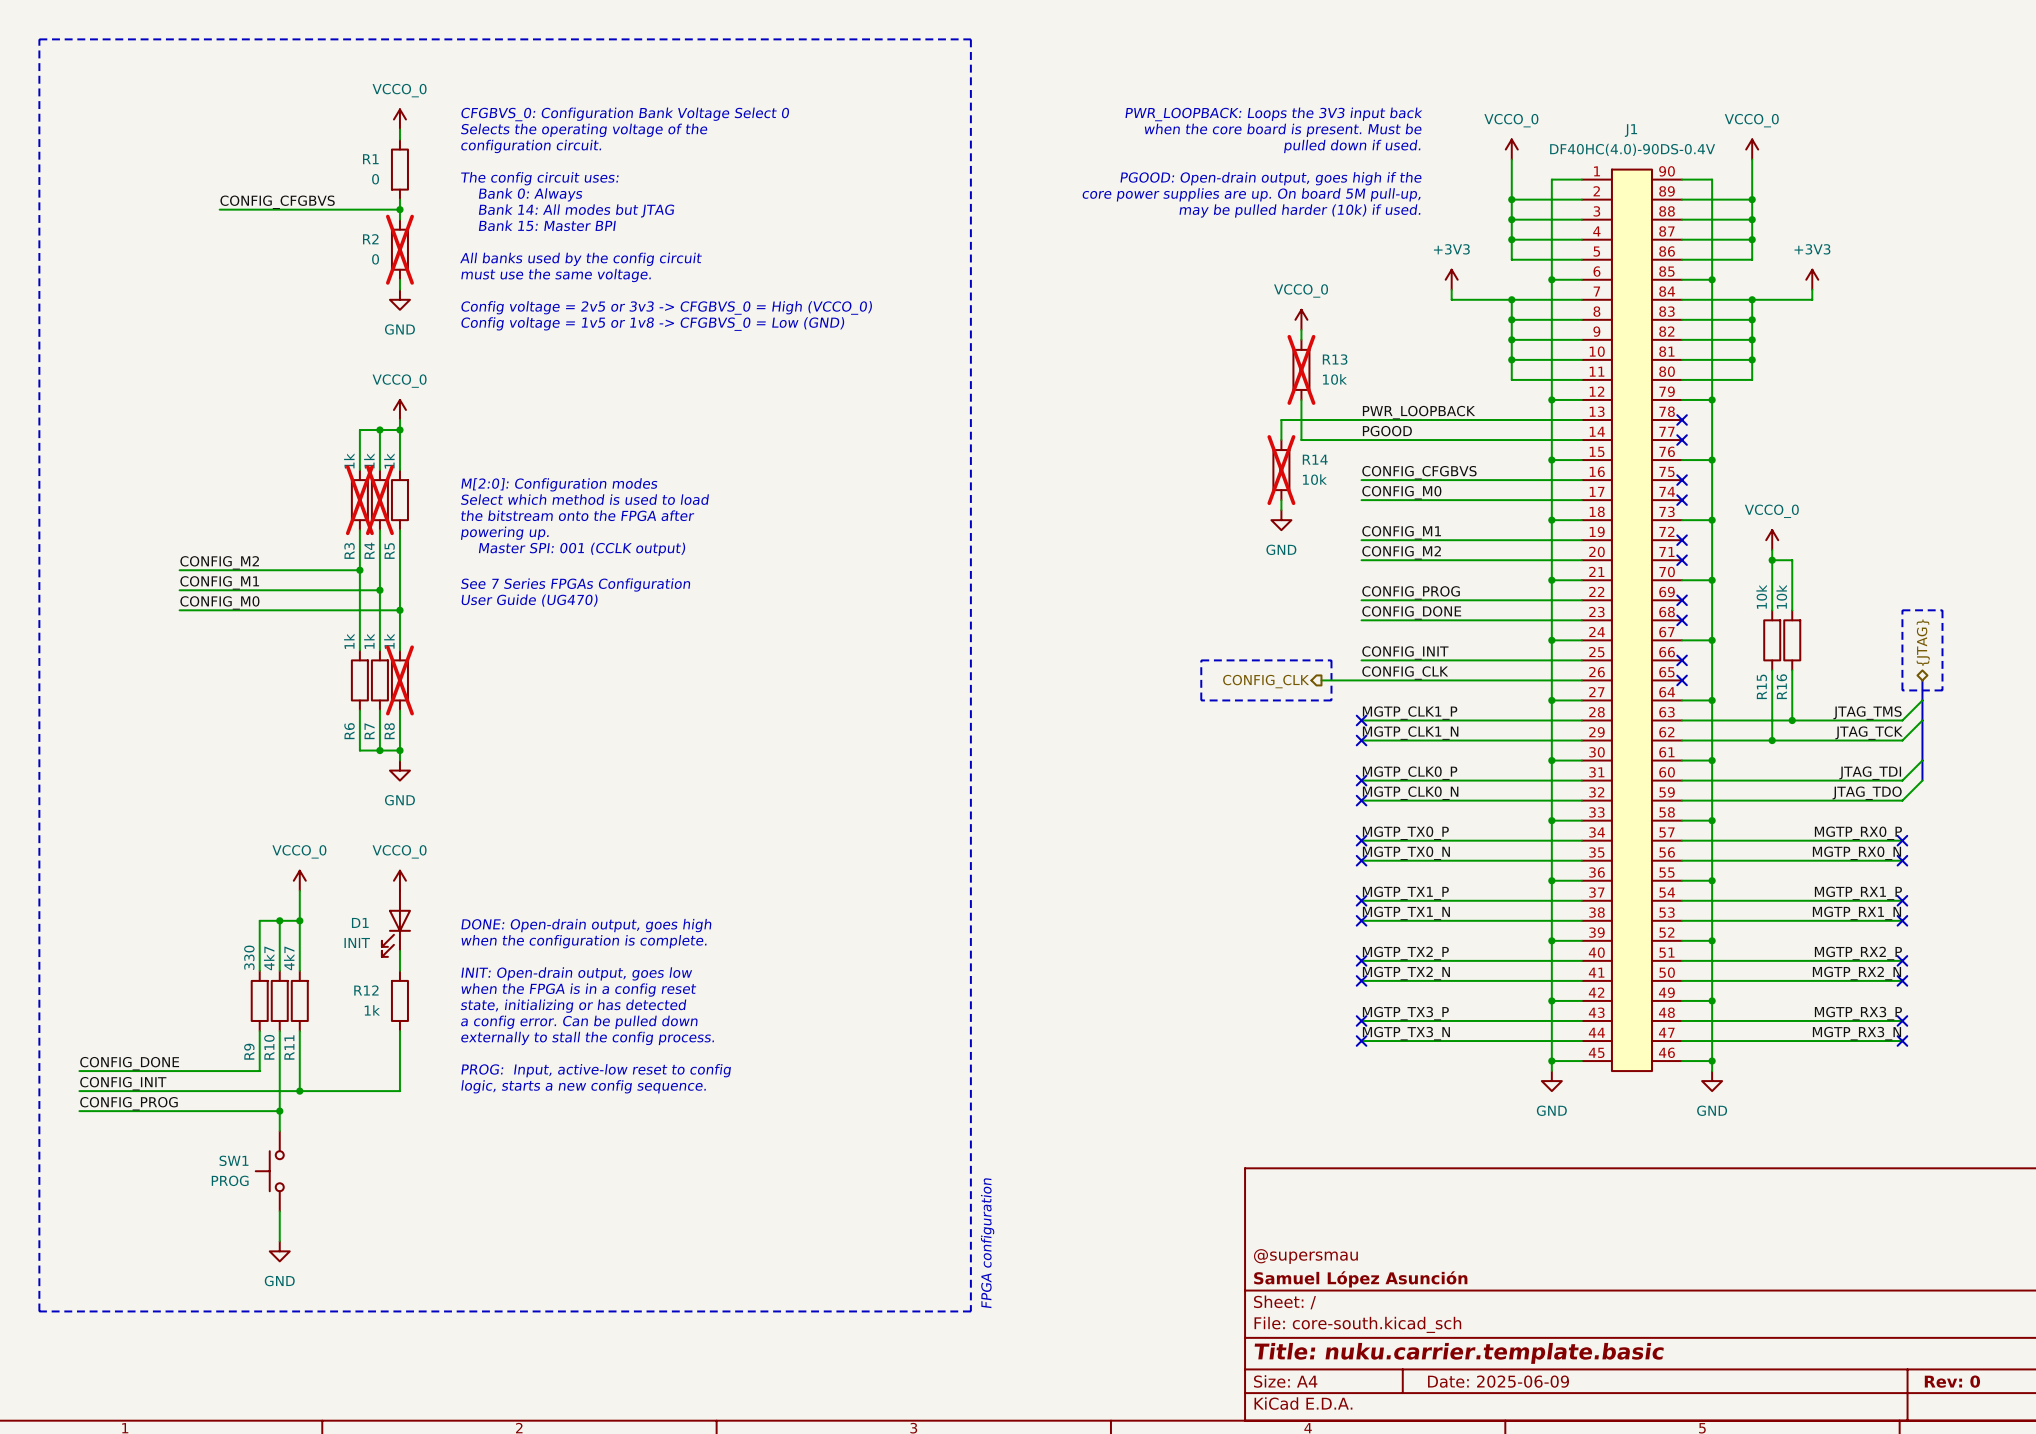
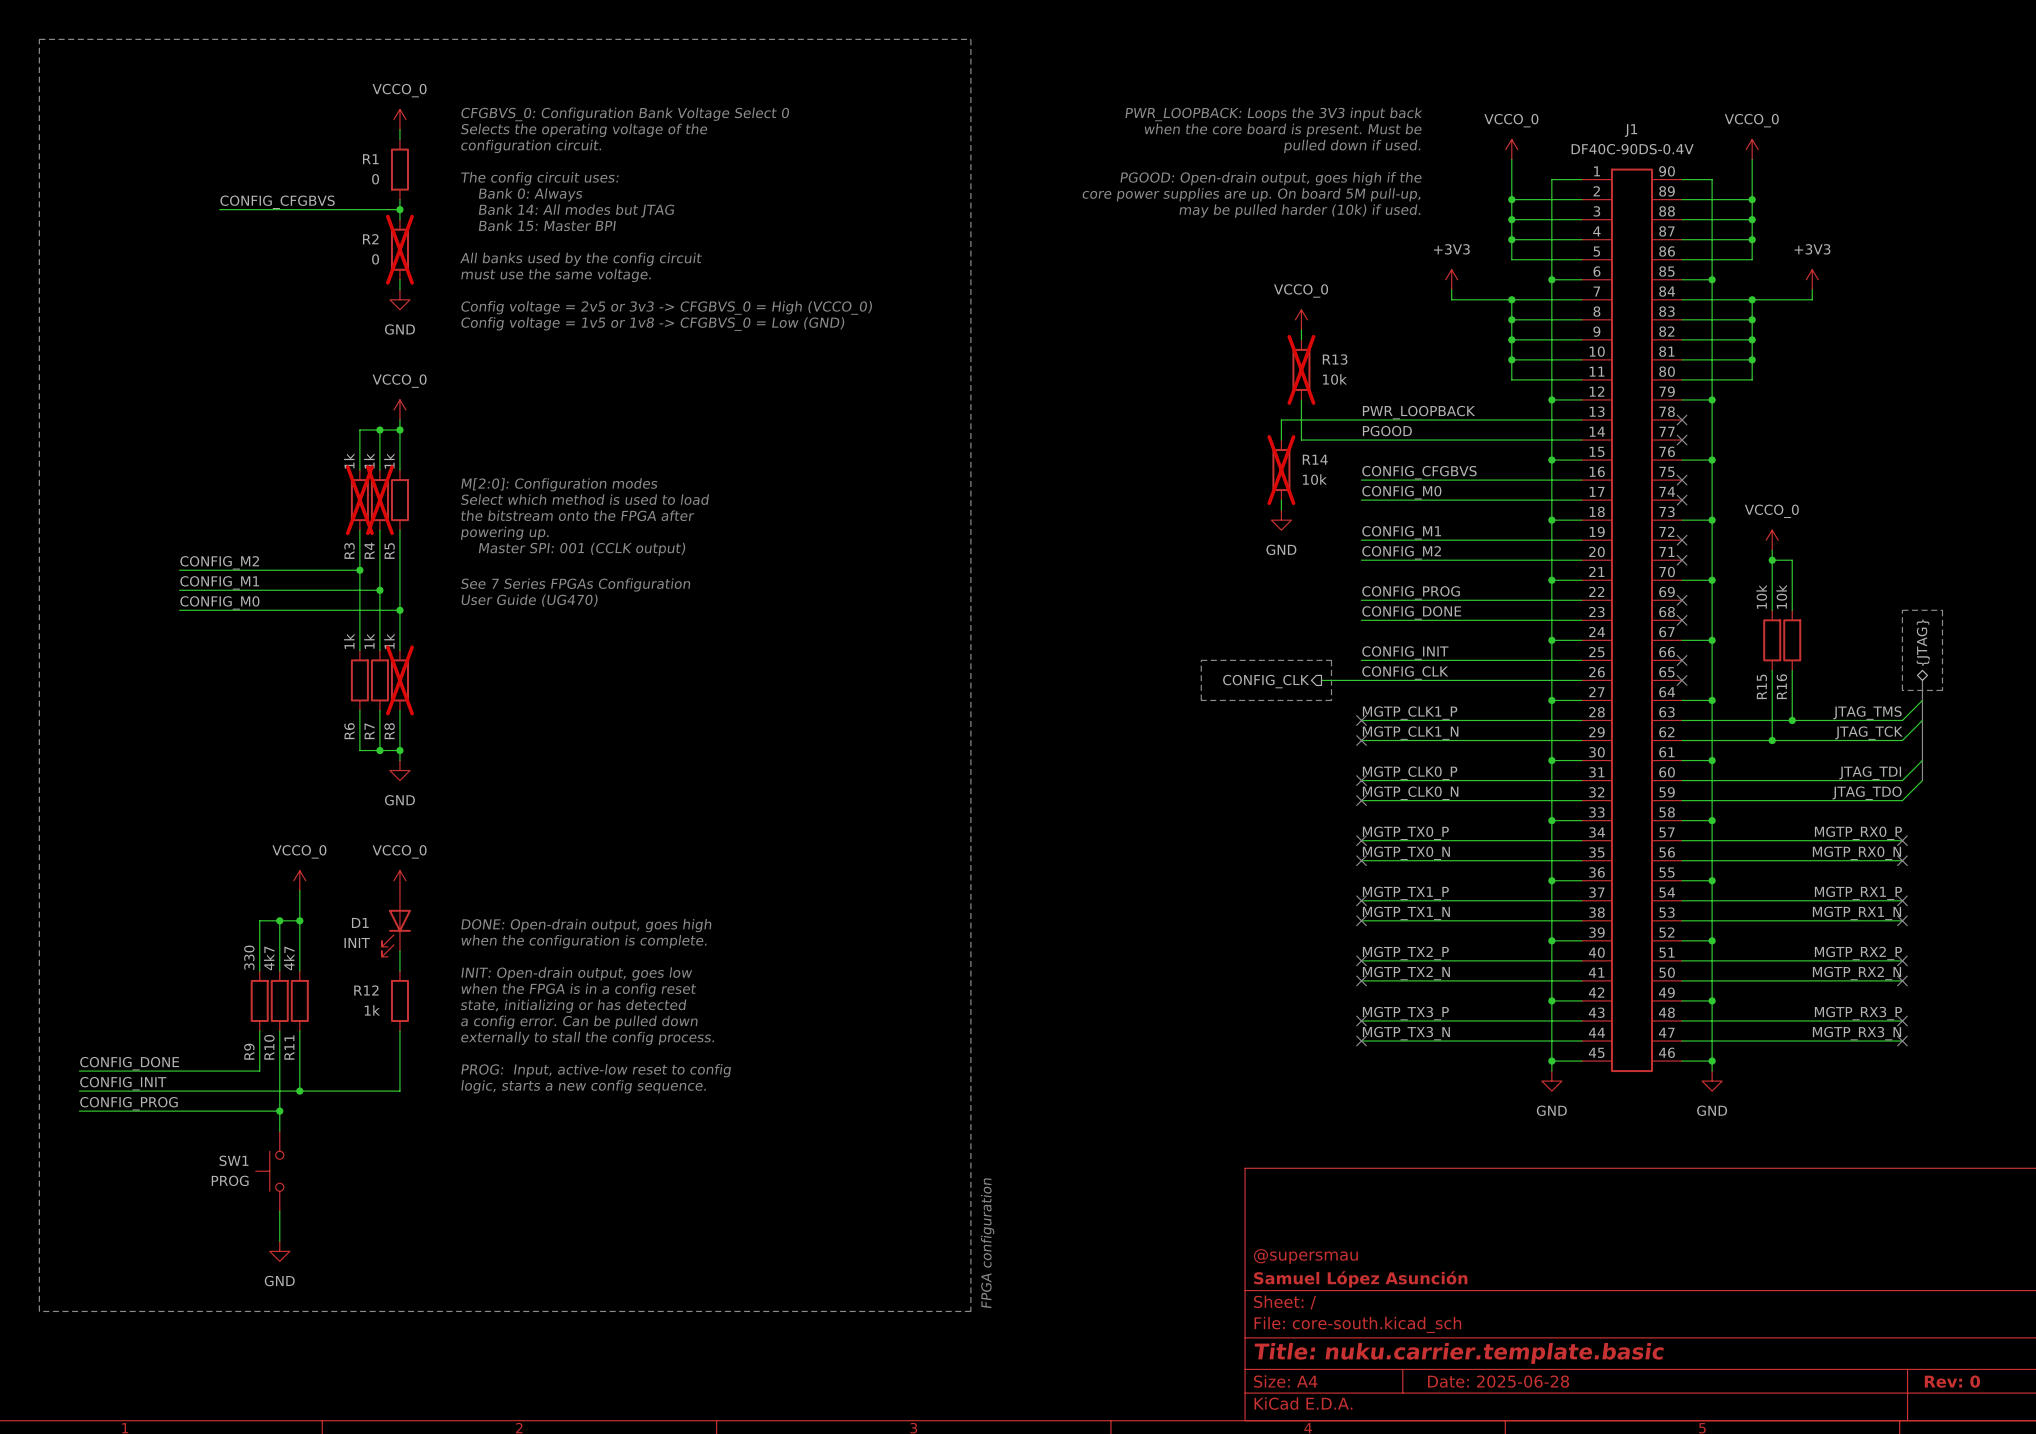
J1 value: DF40HC(4.0)-90DS-0.4V (1632, 149) -> DF40C-90DS-0.4V (1632, 149)
title block: Date: 2025-06-09 (1498, 1381) -> Date: 2025-06-28 (1498, 1381)

